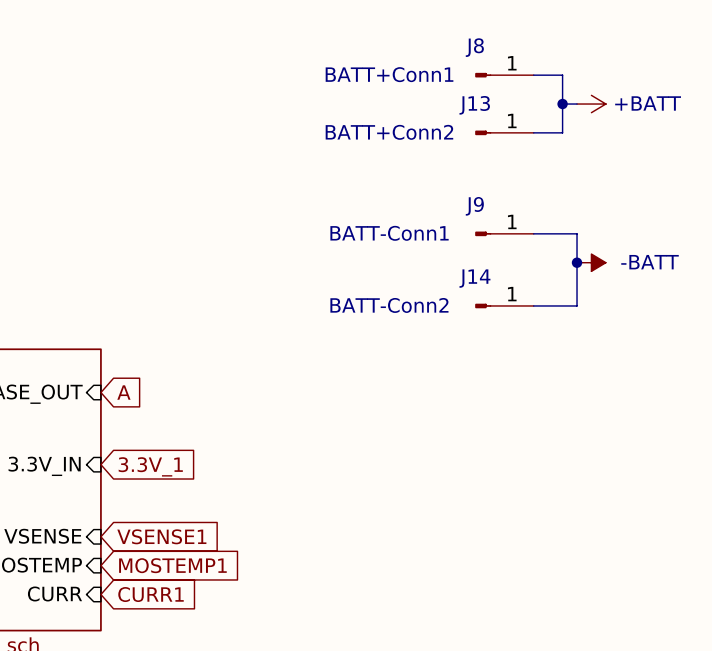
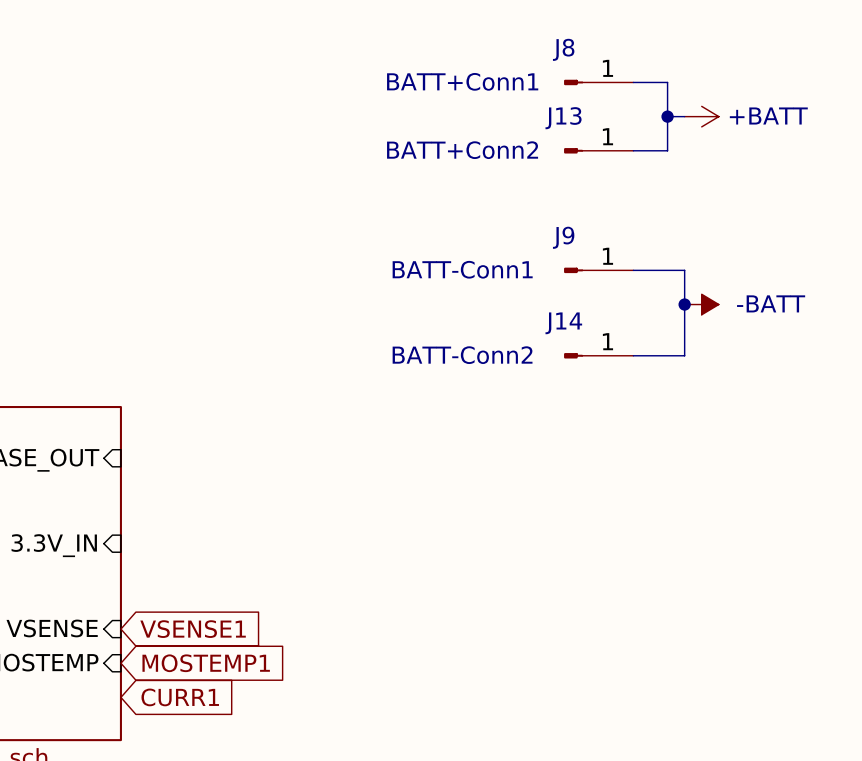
global label: A (123, 392) -> none
global label: 3.3V_1 (150, 466) -> none
sheet pin: CURR (54, 593) -> none

